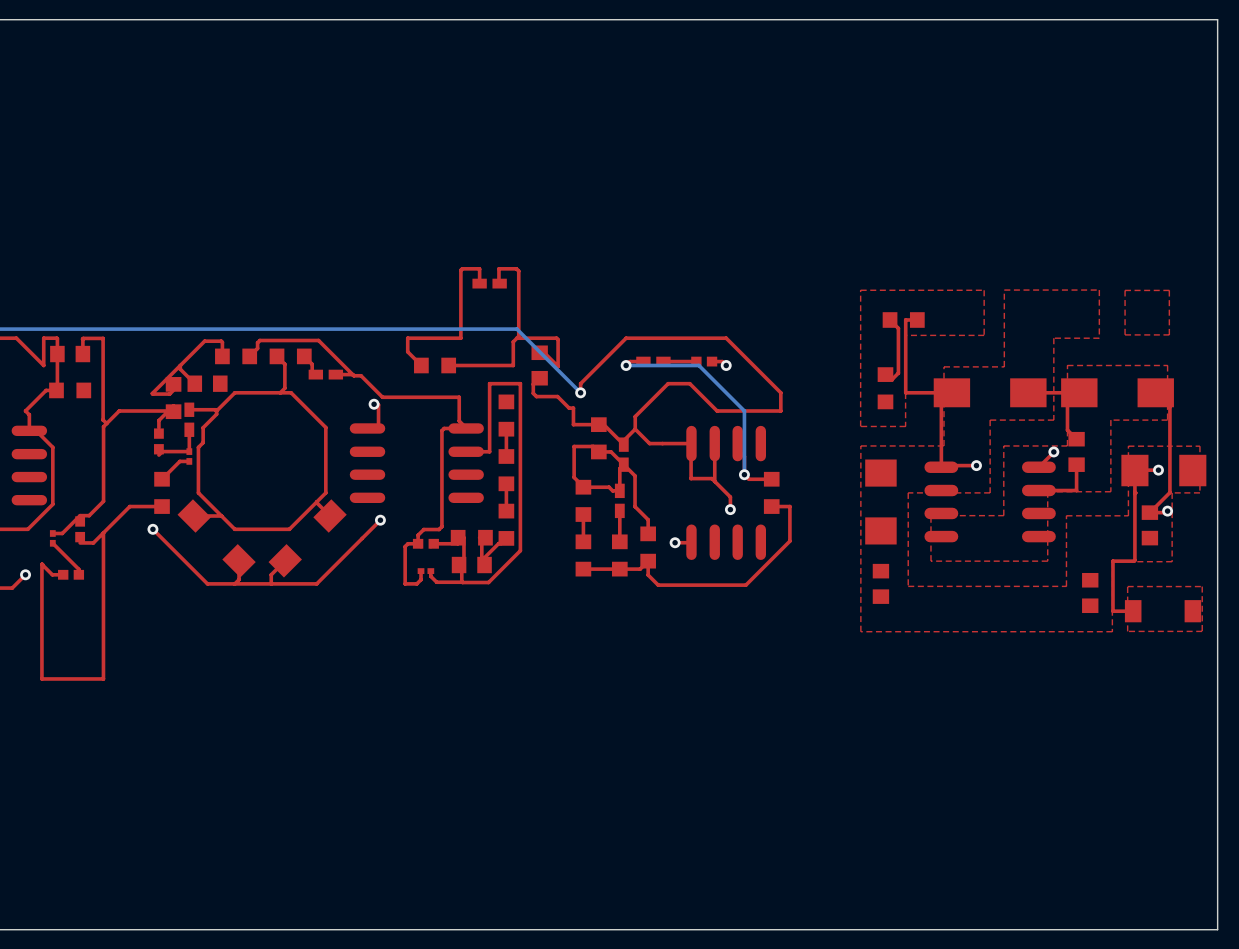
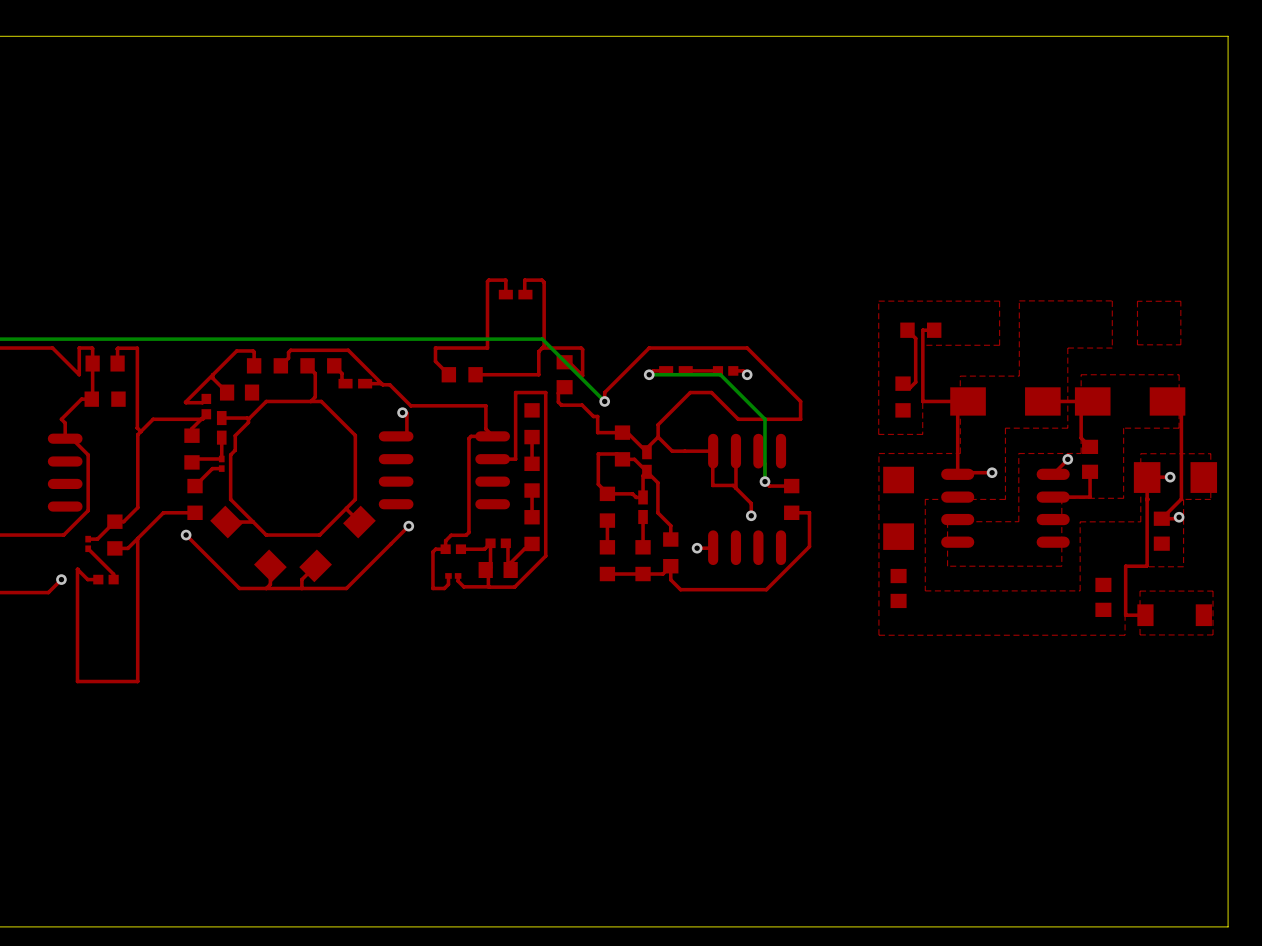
part footprint: [165, 377, 182, 420] -> [201, 393, 212, 420]
part footprint: [154, 428, 164, 455] -> [184, 428, 200, 470]
part footprint: [75, 516, 86, 543] -> [107, 514, 123, 556]
part footprint: [450, 529, 493, 546] -> [485, 538, 511, 549]

